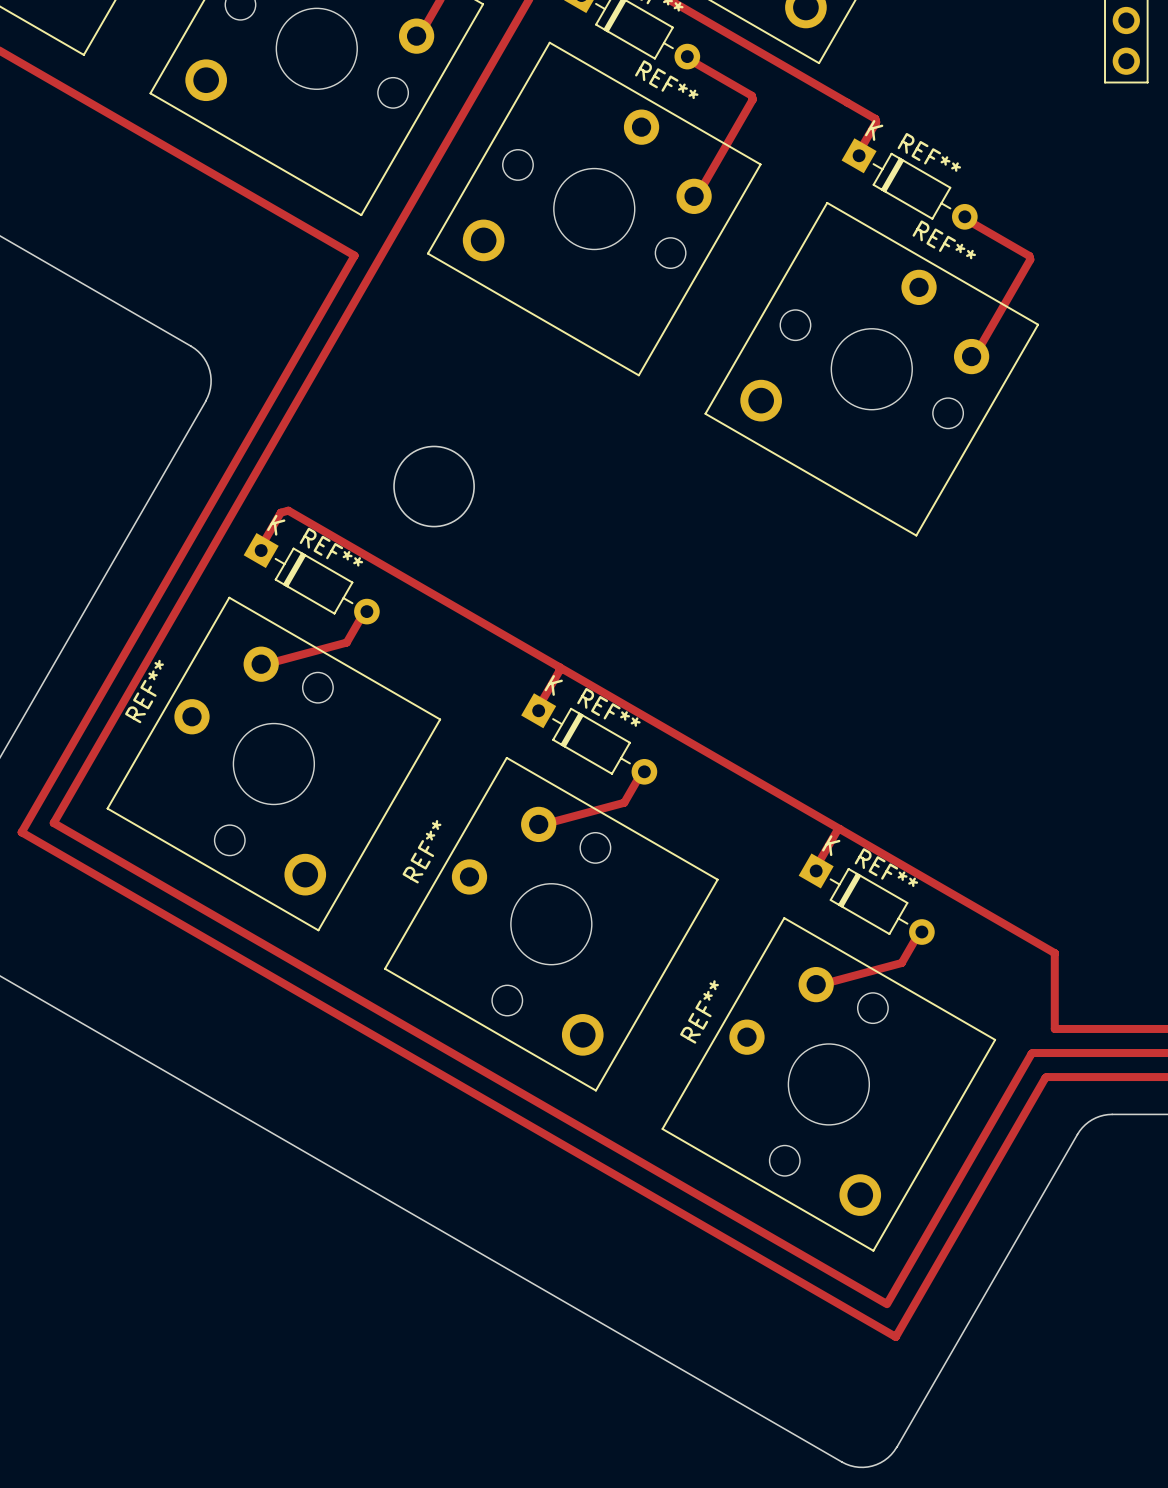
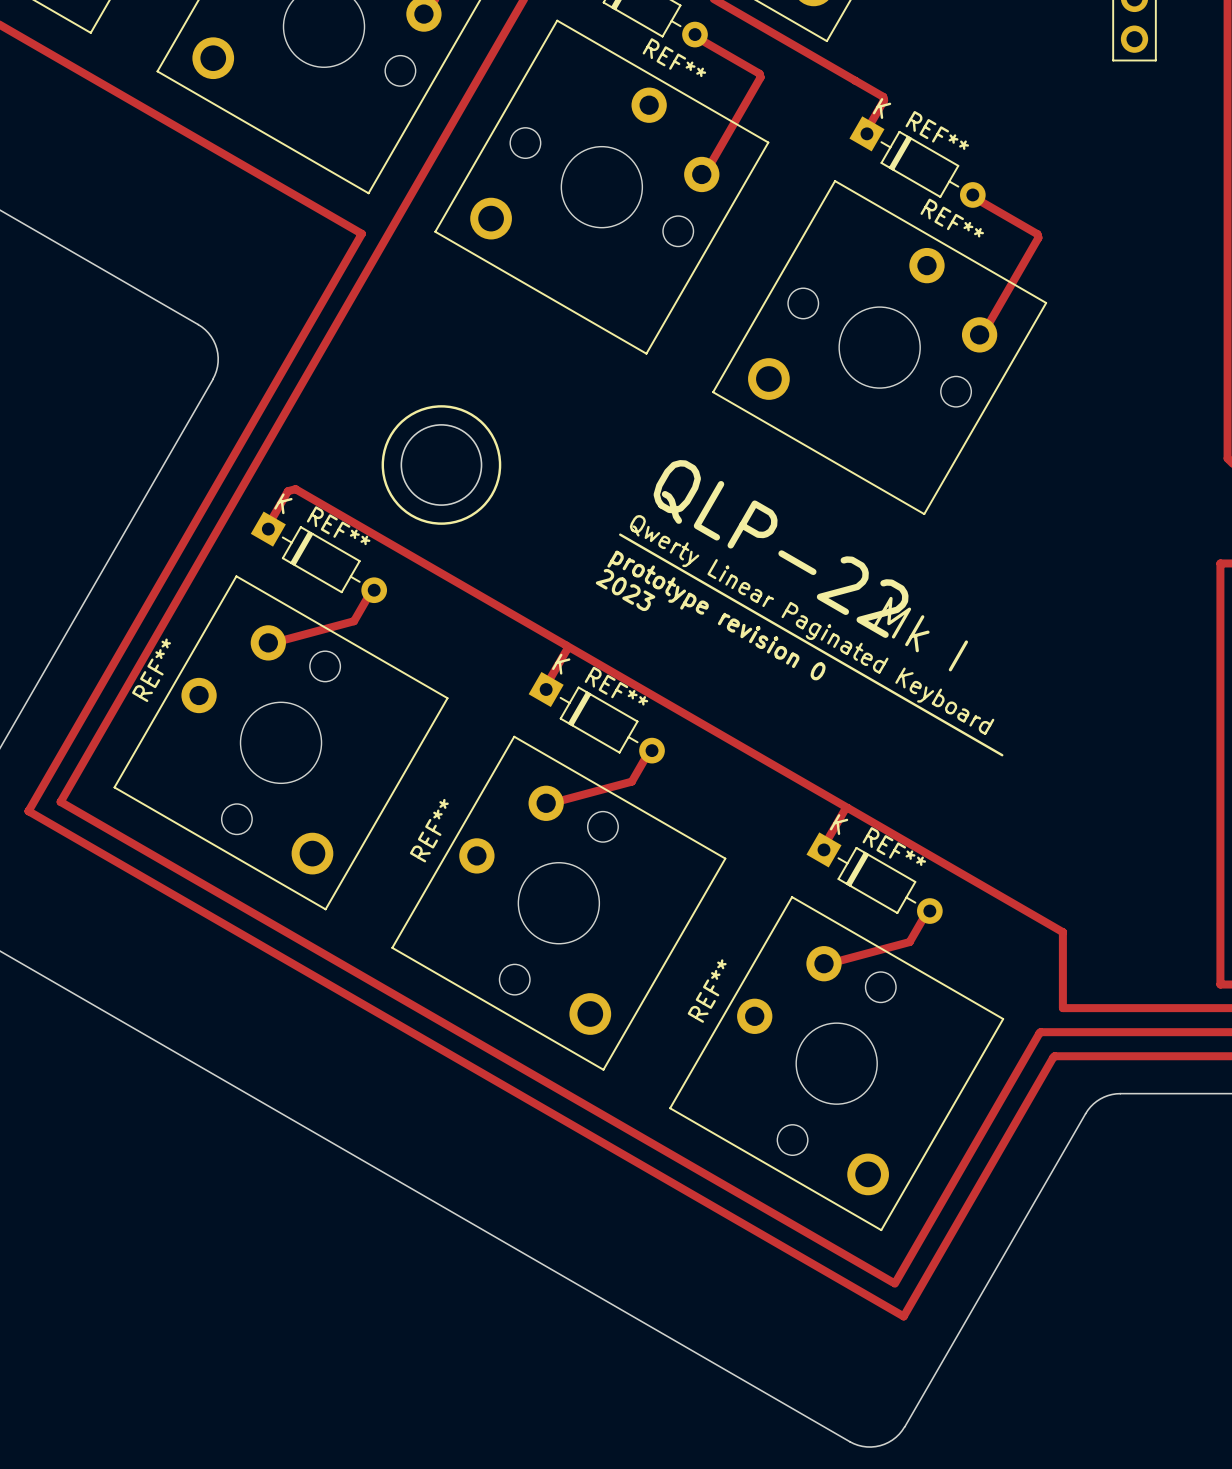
drawing: none -> [381, 405, 502, 525]
line: none -> (620, 534) (1002, 755)
text: none -> QLP-22 (781, 548)
text: none -> 2023 (625, 589)
text: none -> prototype revision 0 (716, 615)
text: none -> Qwerty Linear Paginated Keyboard (812, 625)
text: none -> Mk I (920, 634)

